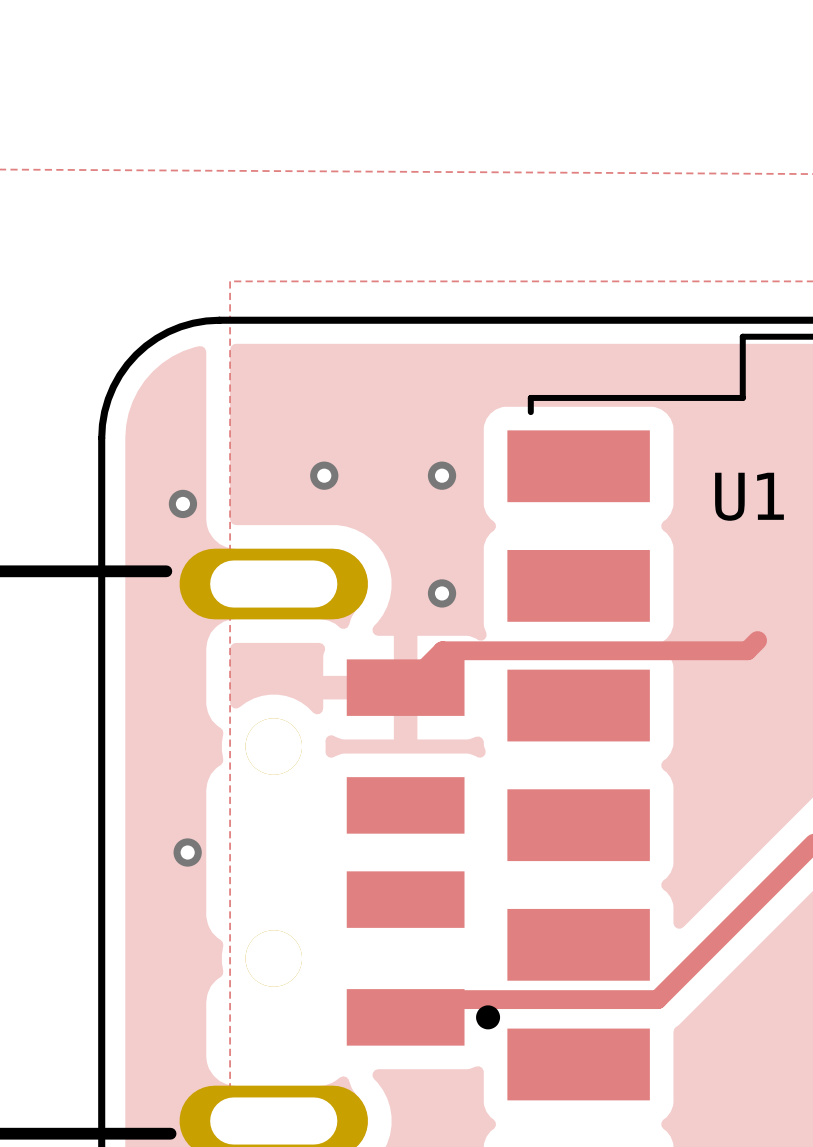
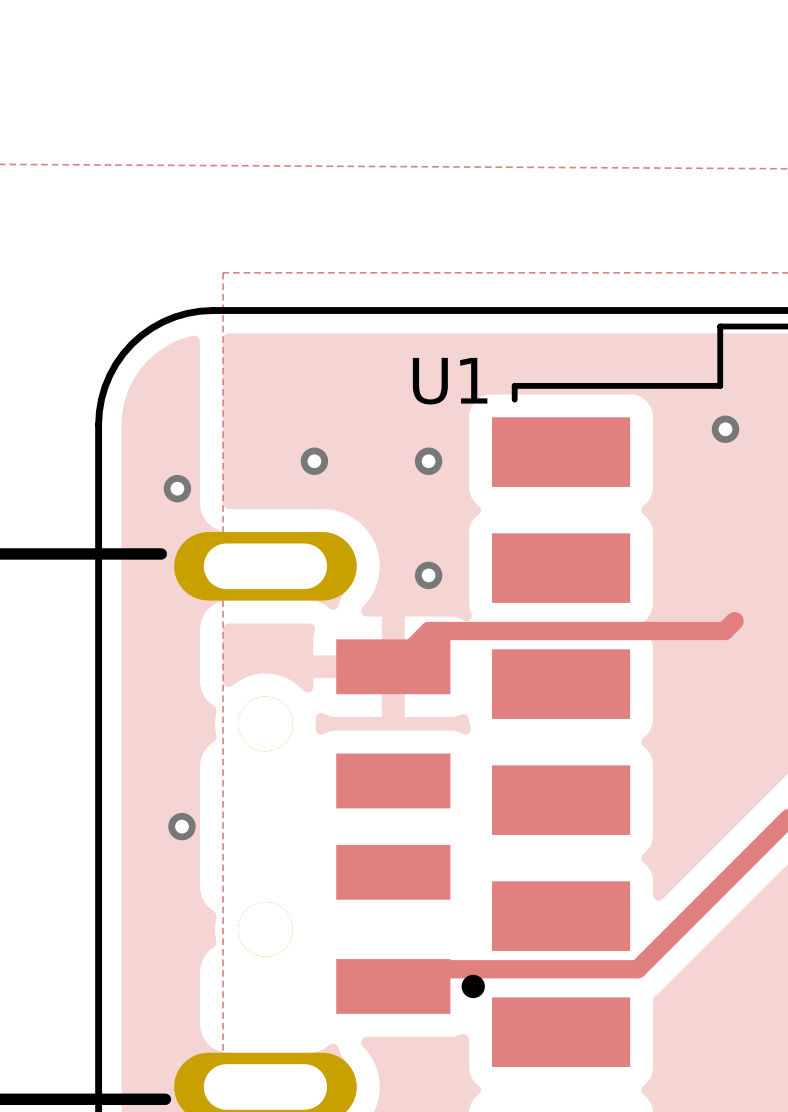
via: none -> (725, 429)
U1 name position: U1 (749, 496) -> U1 (450, 381)

